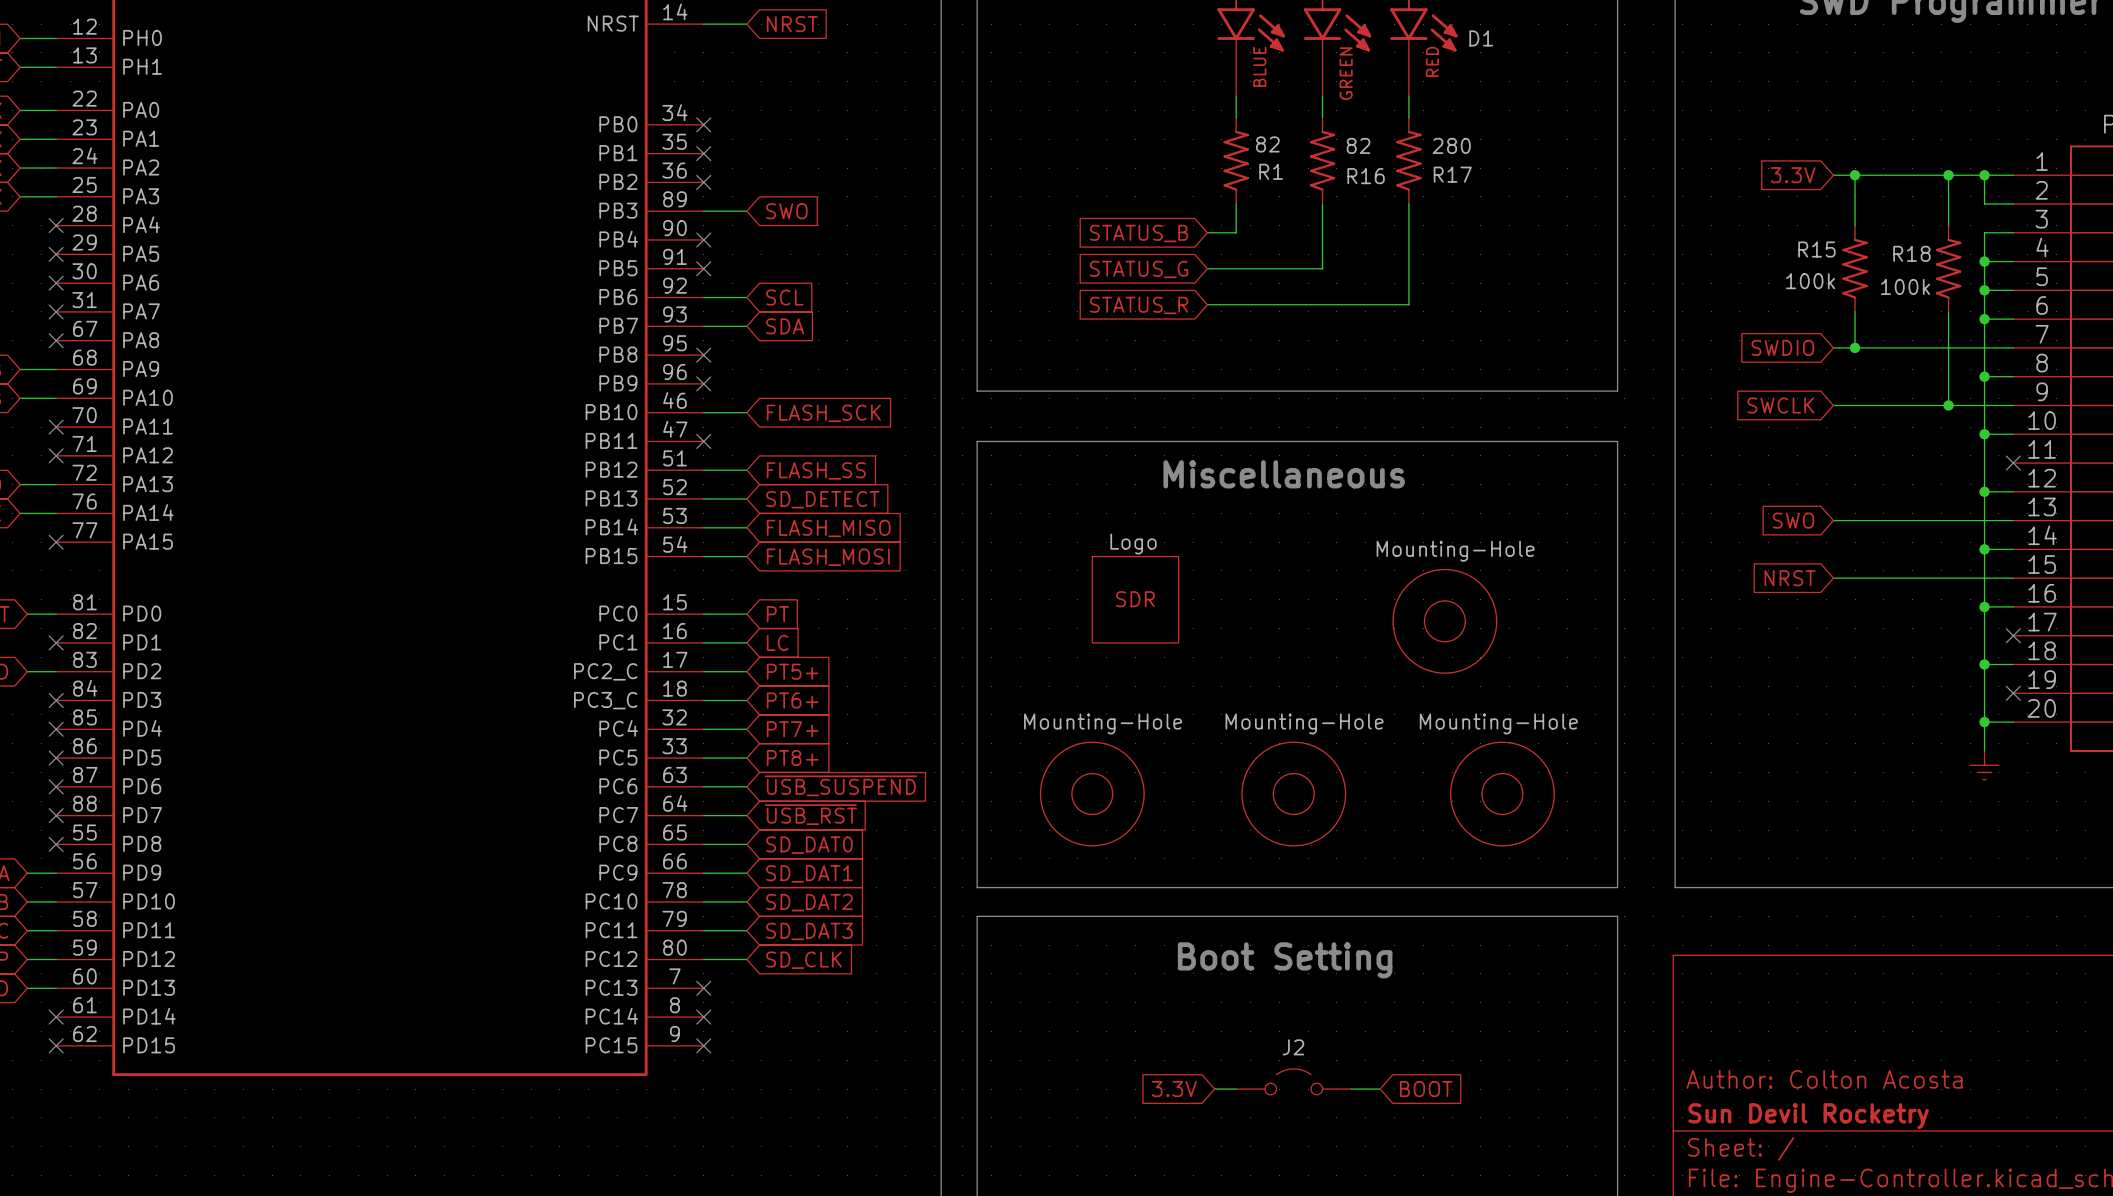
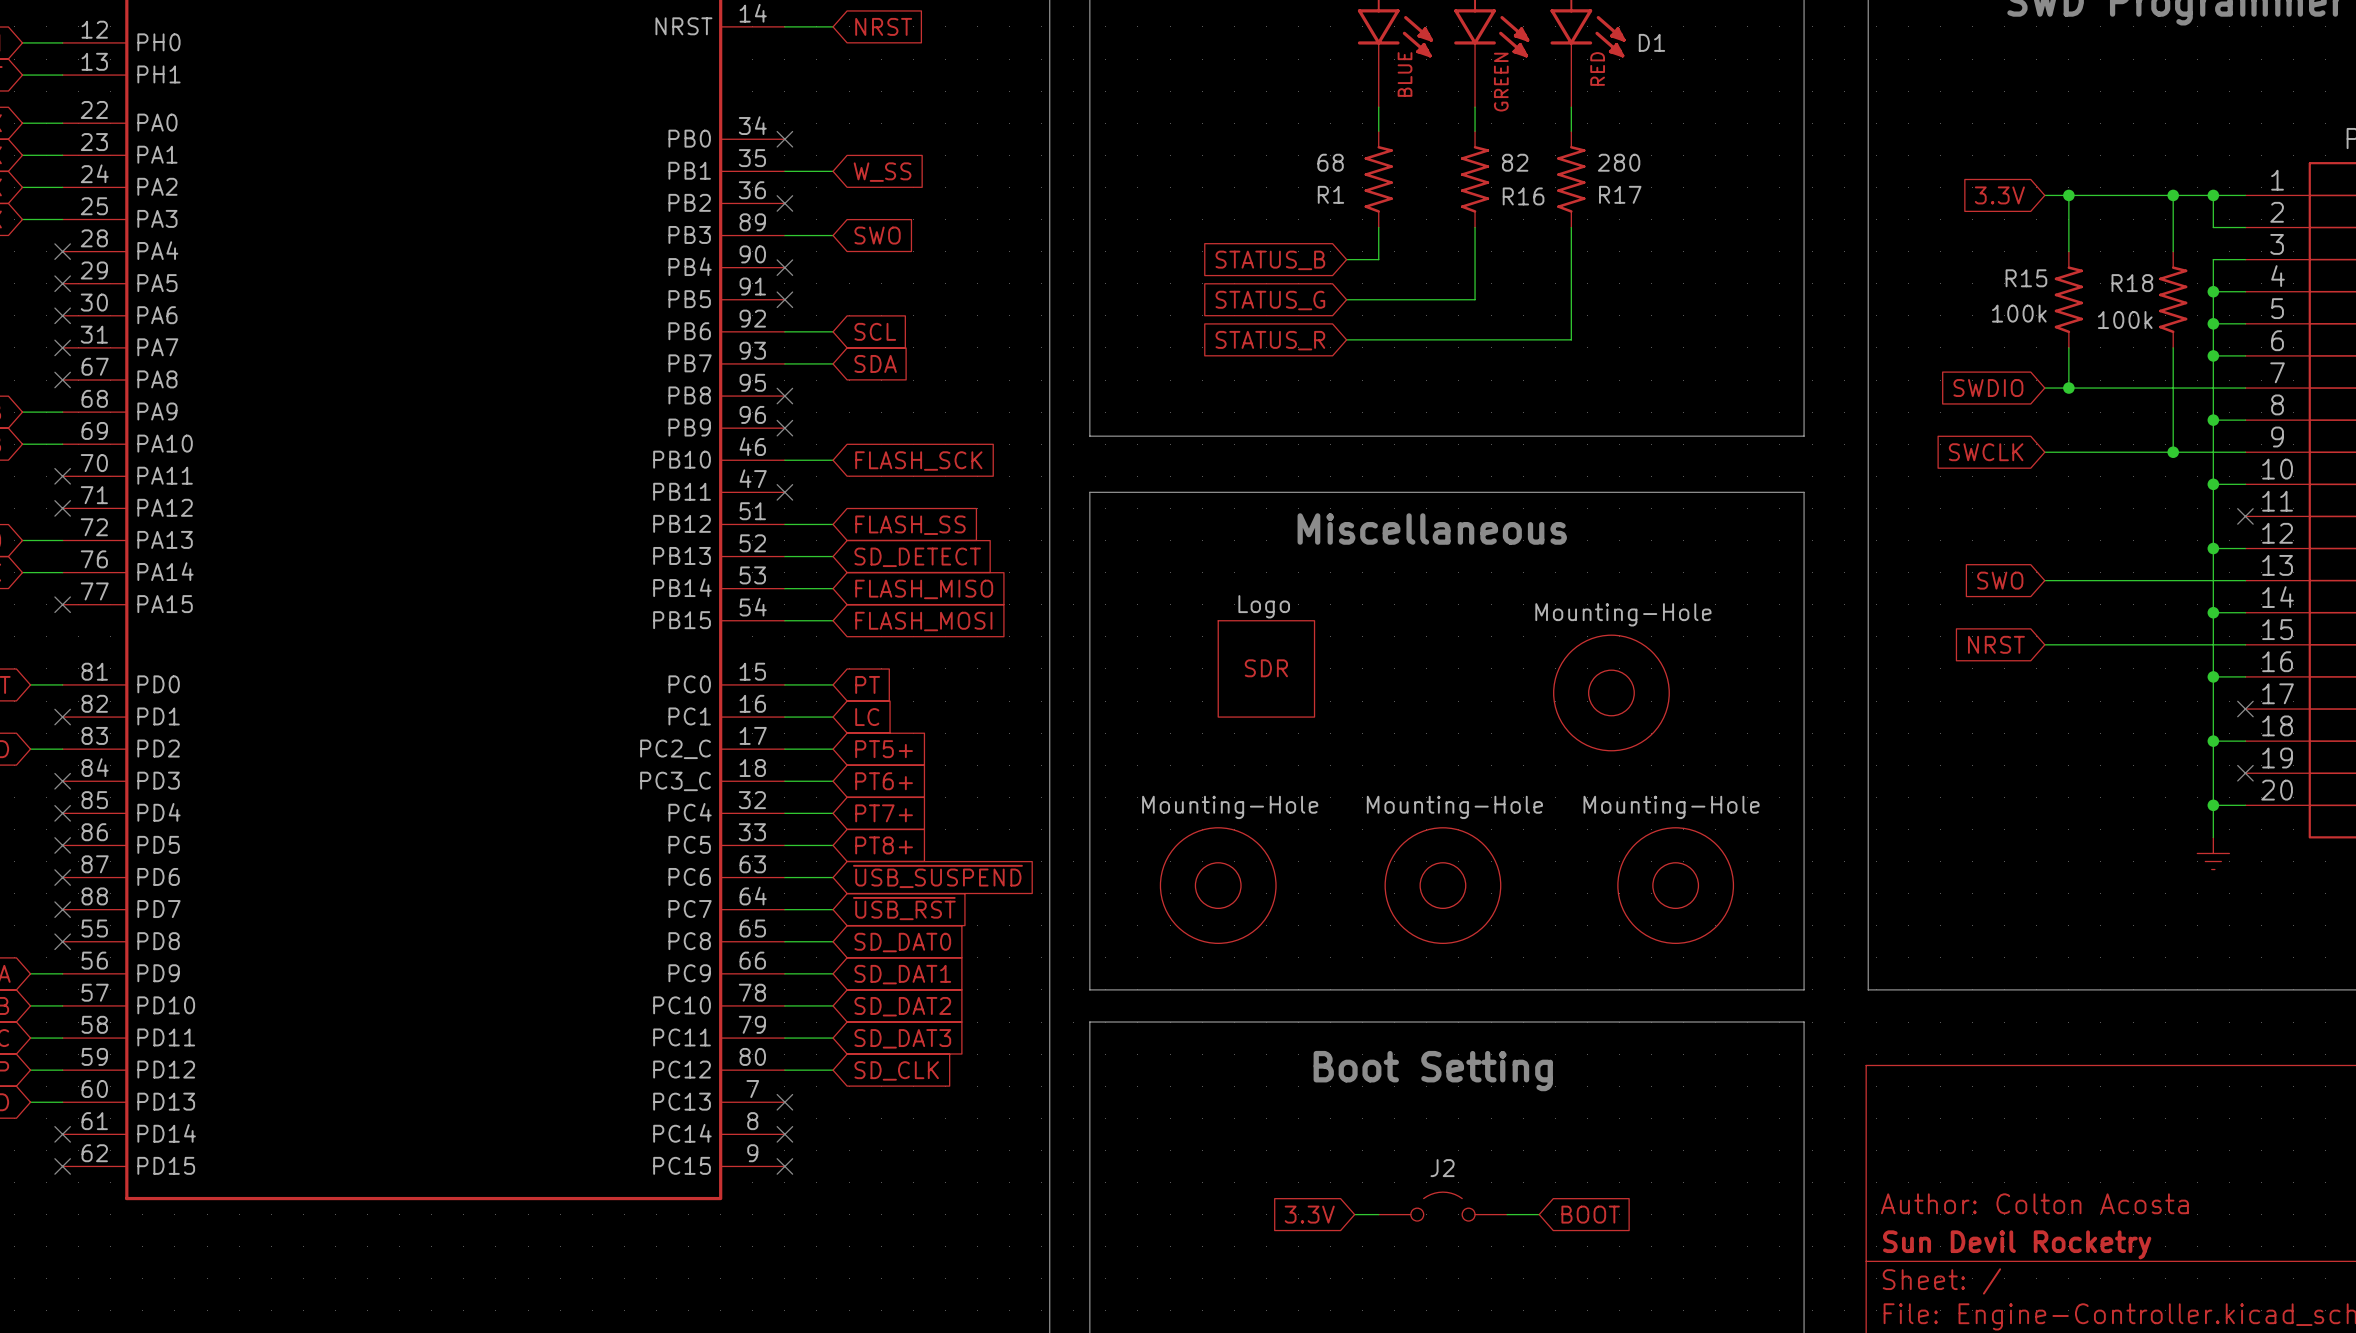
R1 value: 82 (1267, 144) -> 68 (1330, 162)
wire: none -> (784, 171) (833, 171)
no-connect mark: (703, 153) -> none
global label: none -> W_SS (882, 172)
R1 name position: R1 (1271, 171) -> R1 (1330, 194)

